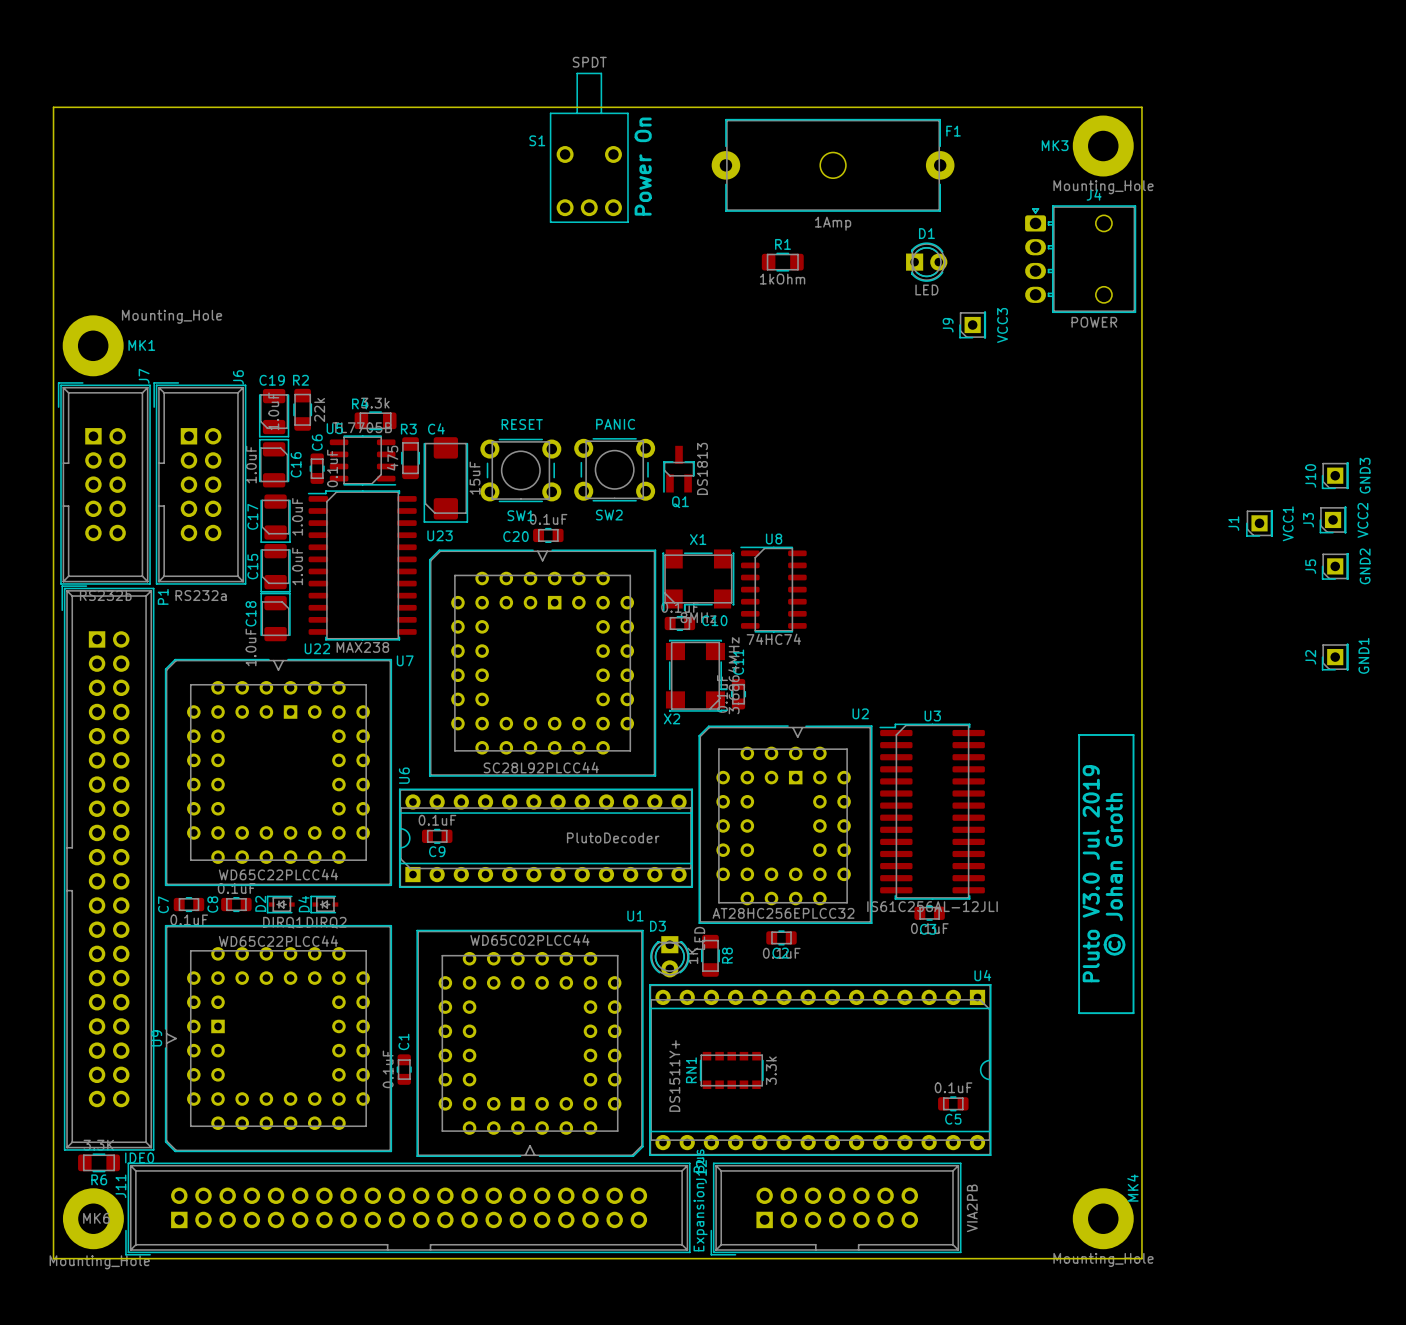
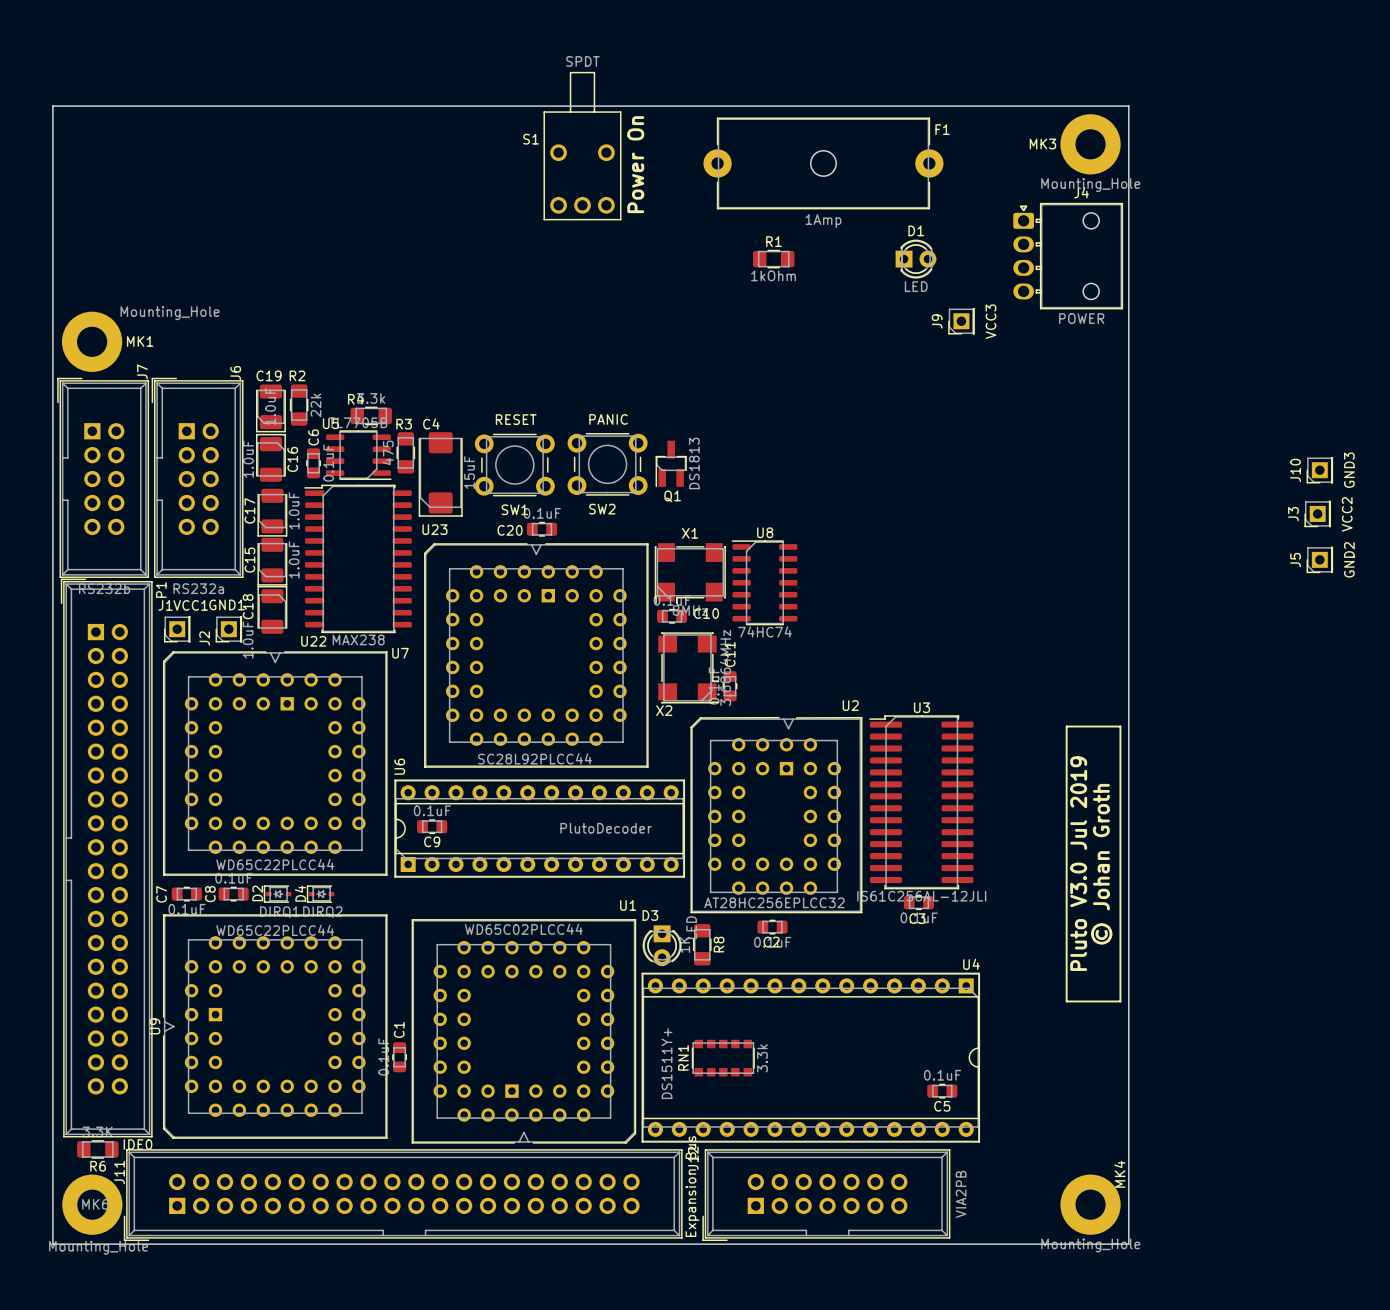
J1 name rotation: 0° (1233, 523) -> 90° clockwise (165, 605)
J1 name position: J1 (1233, 523) -> J1 (165, 605)
J1 position: (1259, 523) -> (177, 629)
J1 value rotation: 0° (1288, 523) -> 90° clockwise (190, 605)
J2 value rotation: 0° (1363, 655) -> 90° clockwise (226, 604)
J2 name position: J2 (1310, 657) -> J2 (204, 638)
J2 position: (1335, 657) -> (228, 629)

